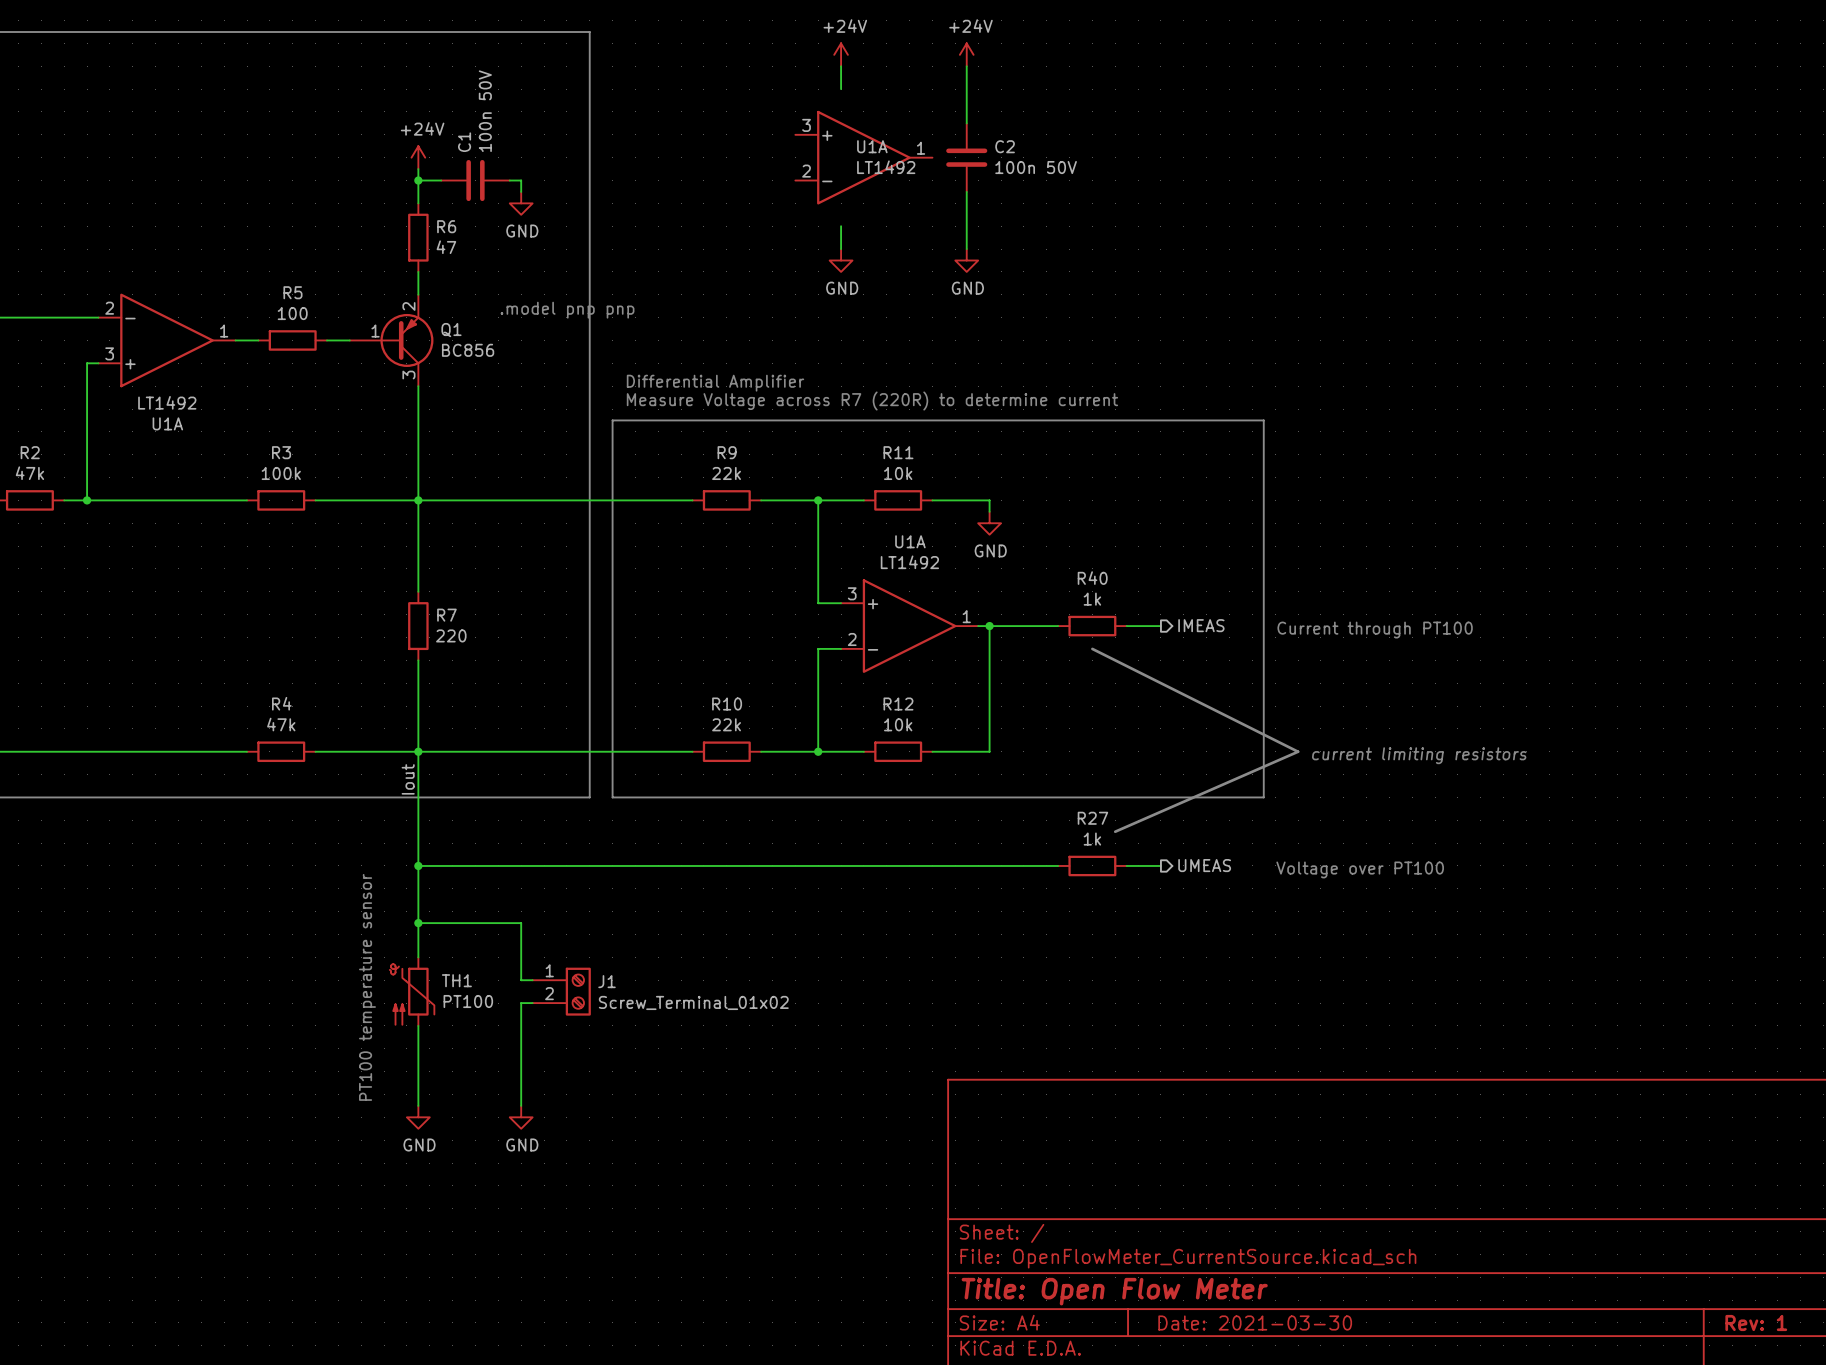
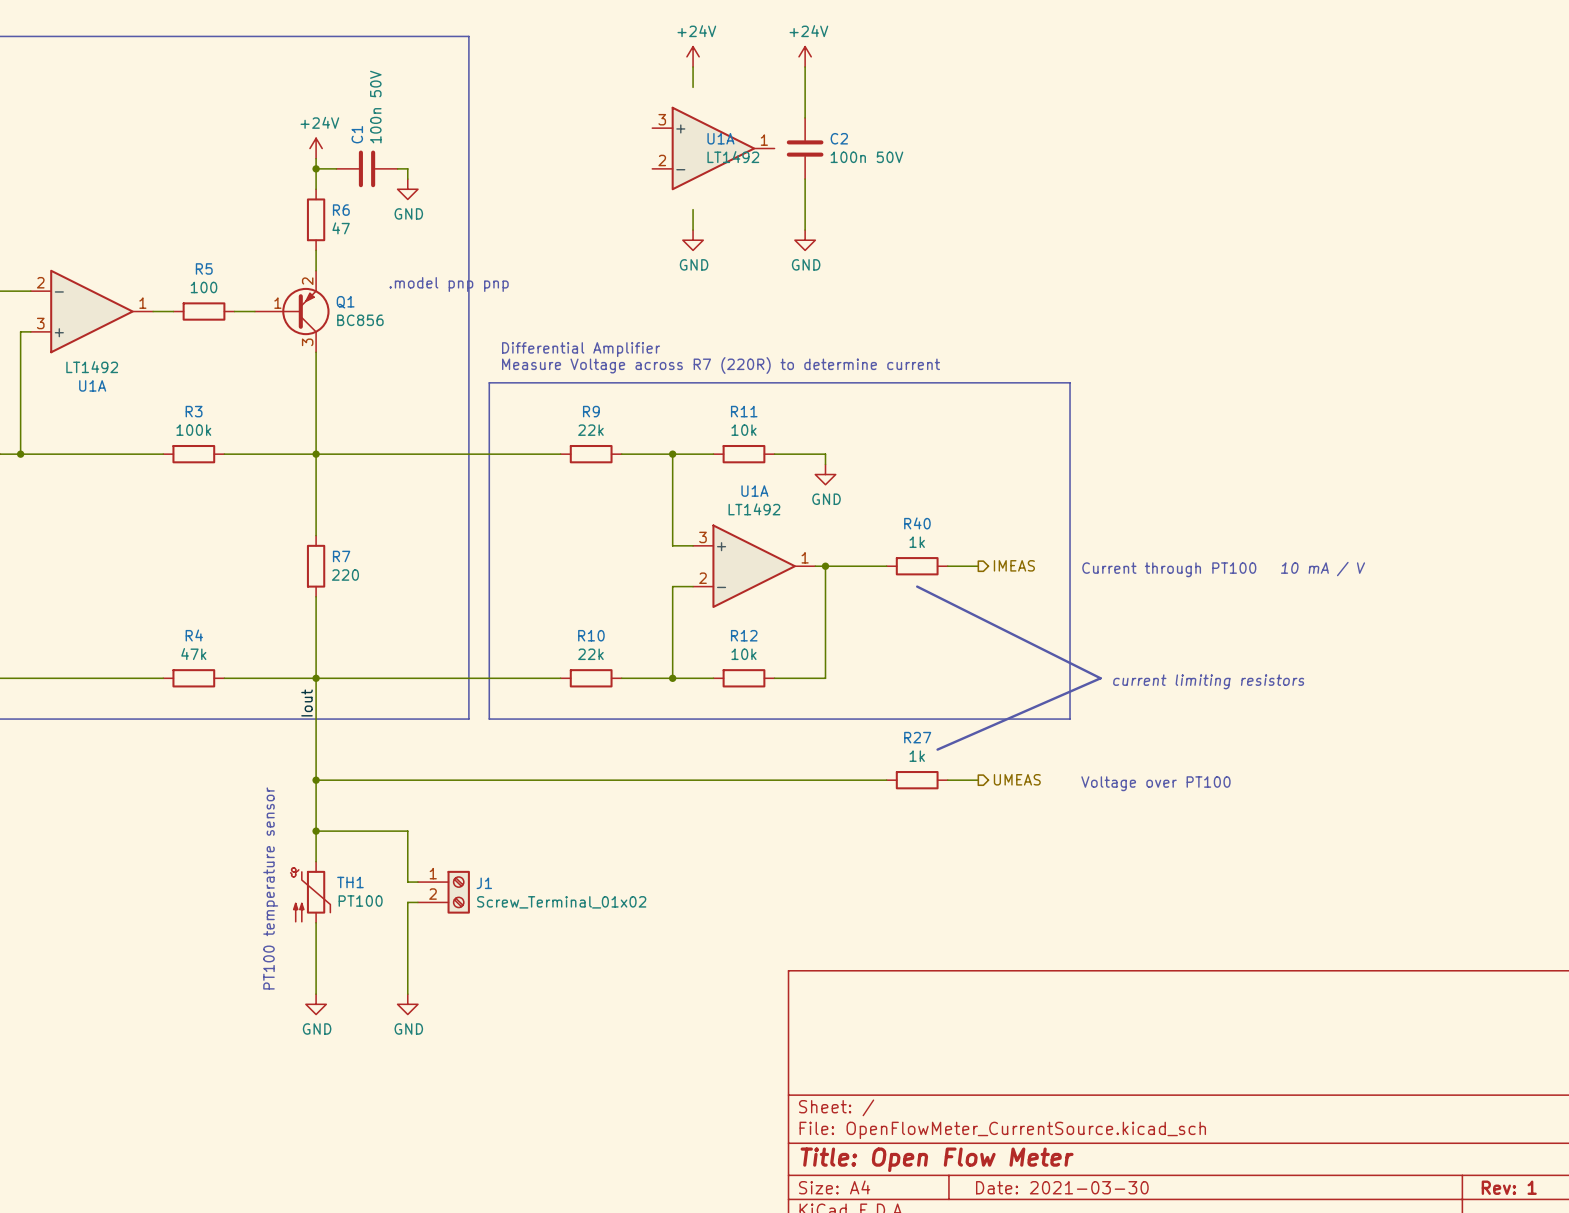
text: none -> 10 mA / V (1323, 569)

